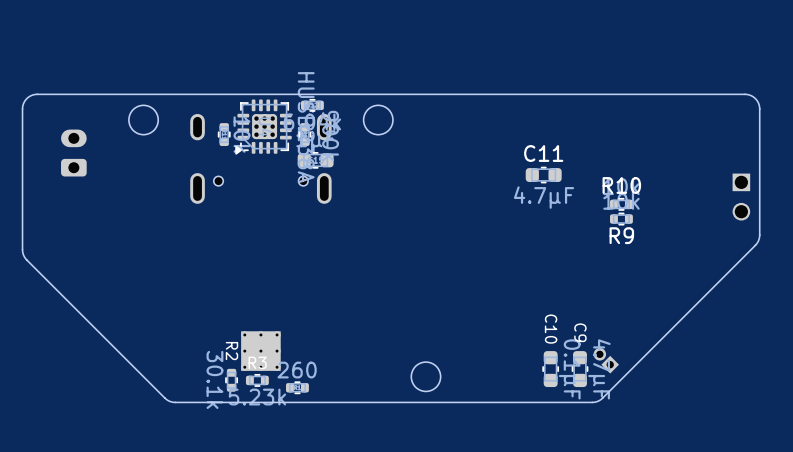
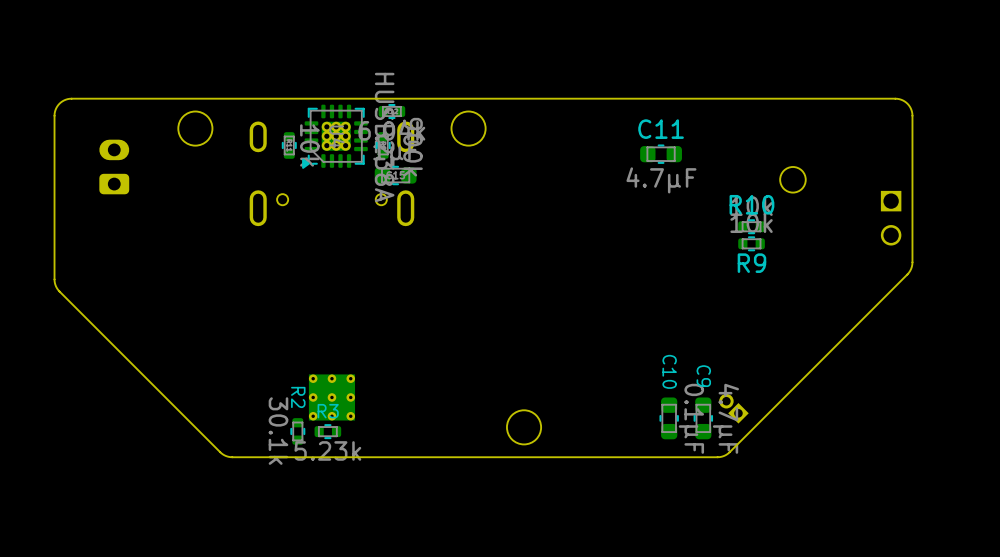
round board edge: none -> [779, 166, 807, 194]
C11 position: (543, 175) -> (661, 154)
part: 260 (297, 387) -> none

